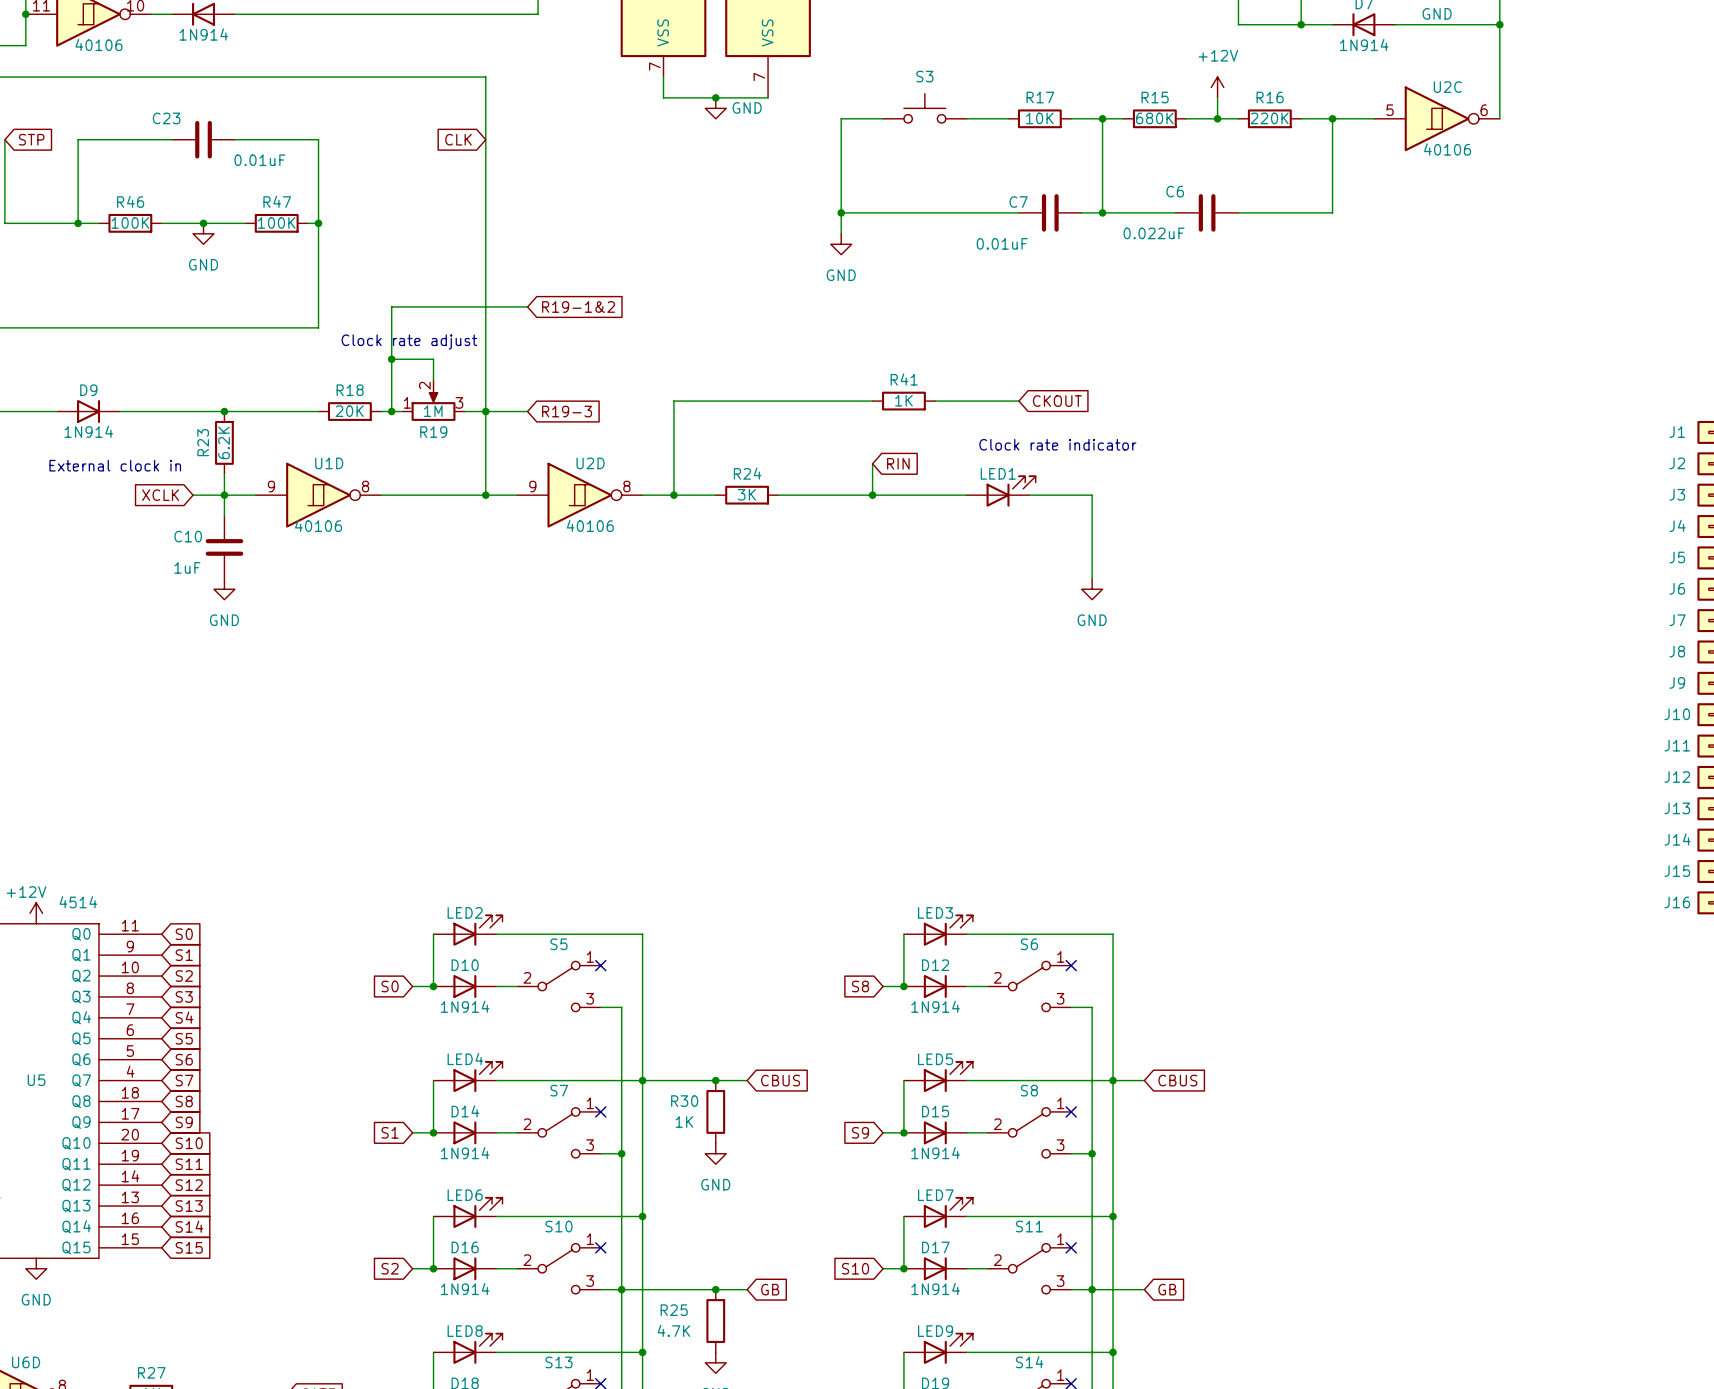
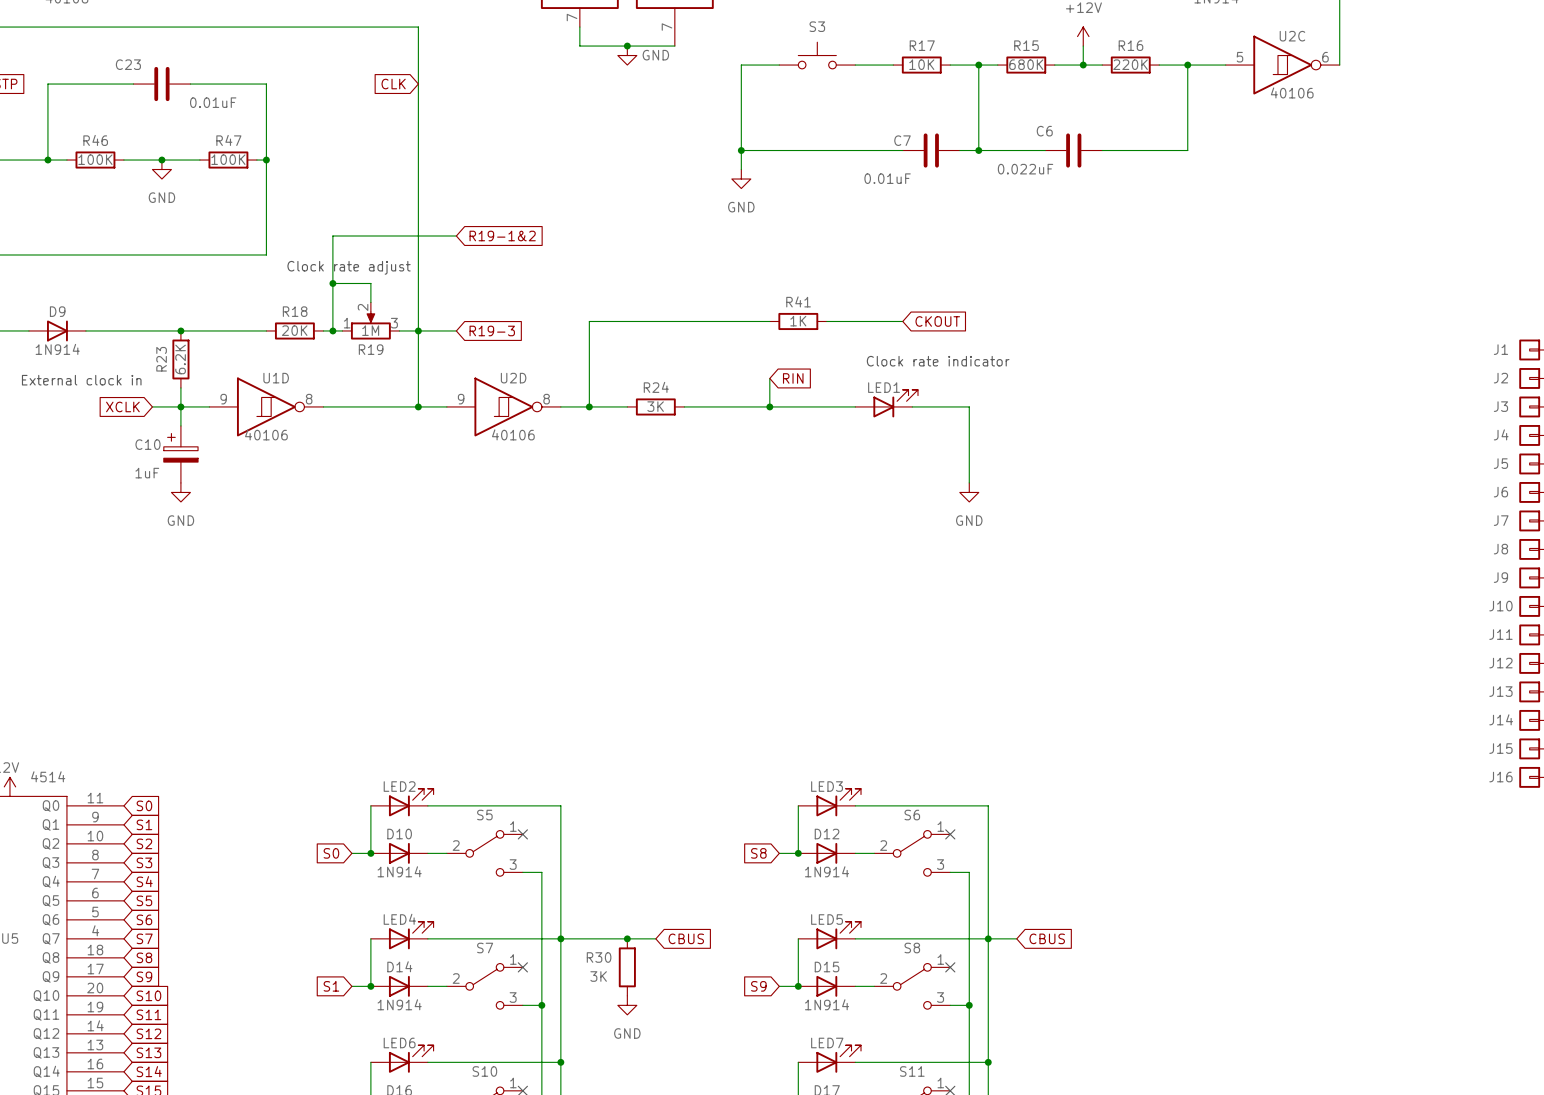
C10 symbol: [205, 516, 244, 579] -> [163, 425, 199, 483]
R30 value: 1K (684, 1122) -> 3K (598, 976)

